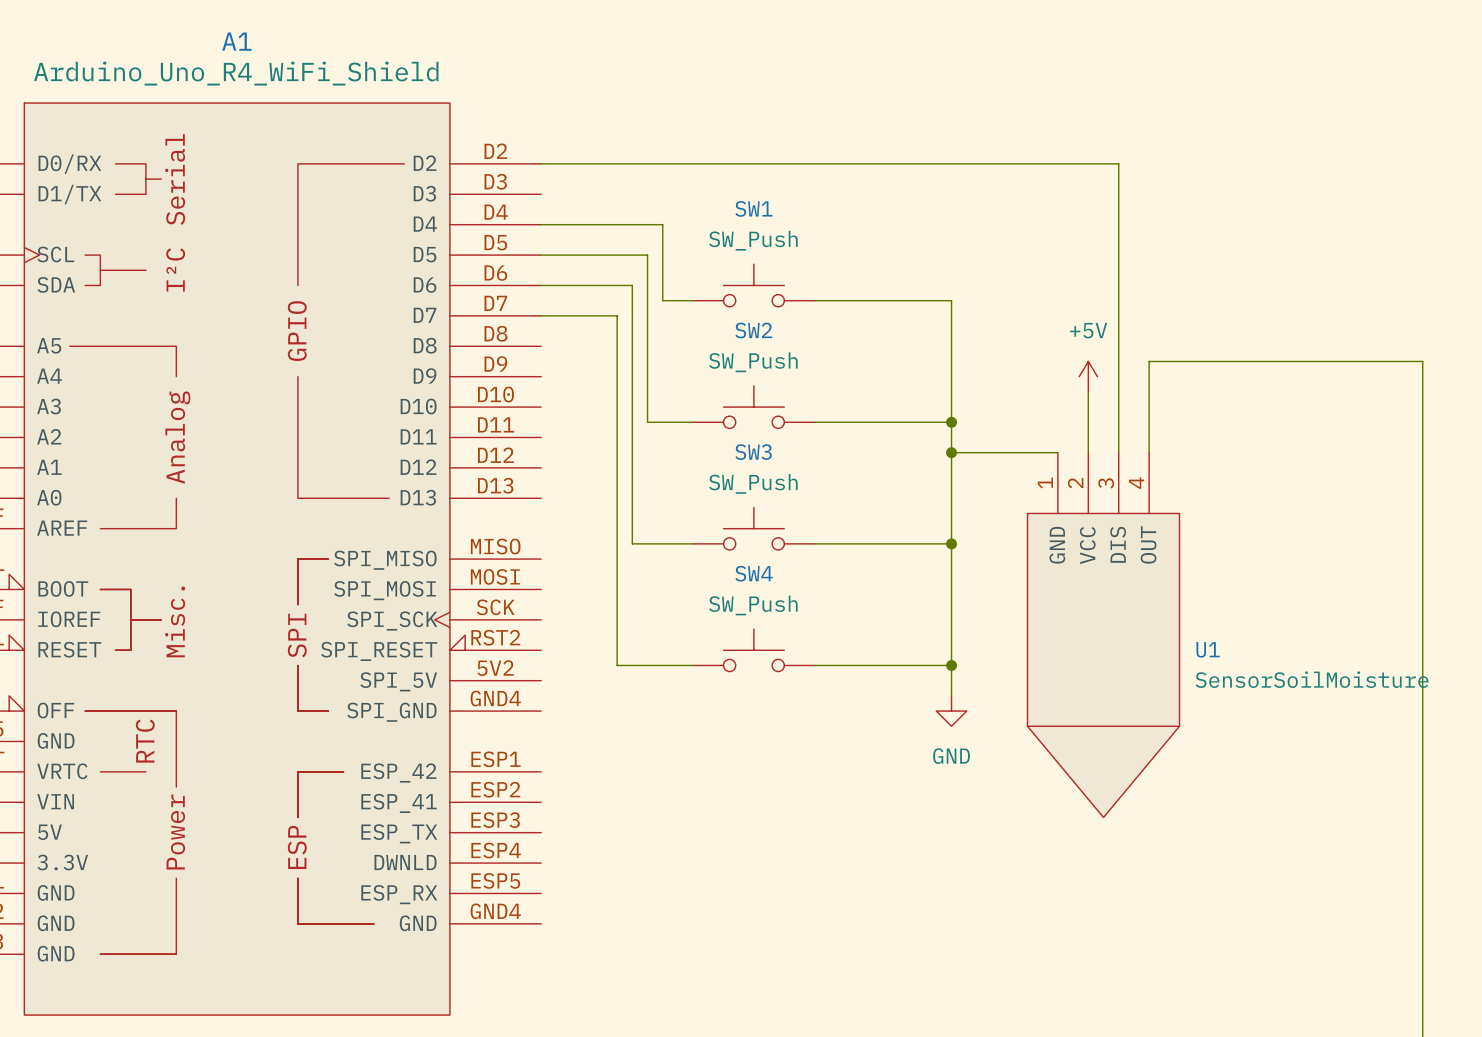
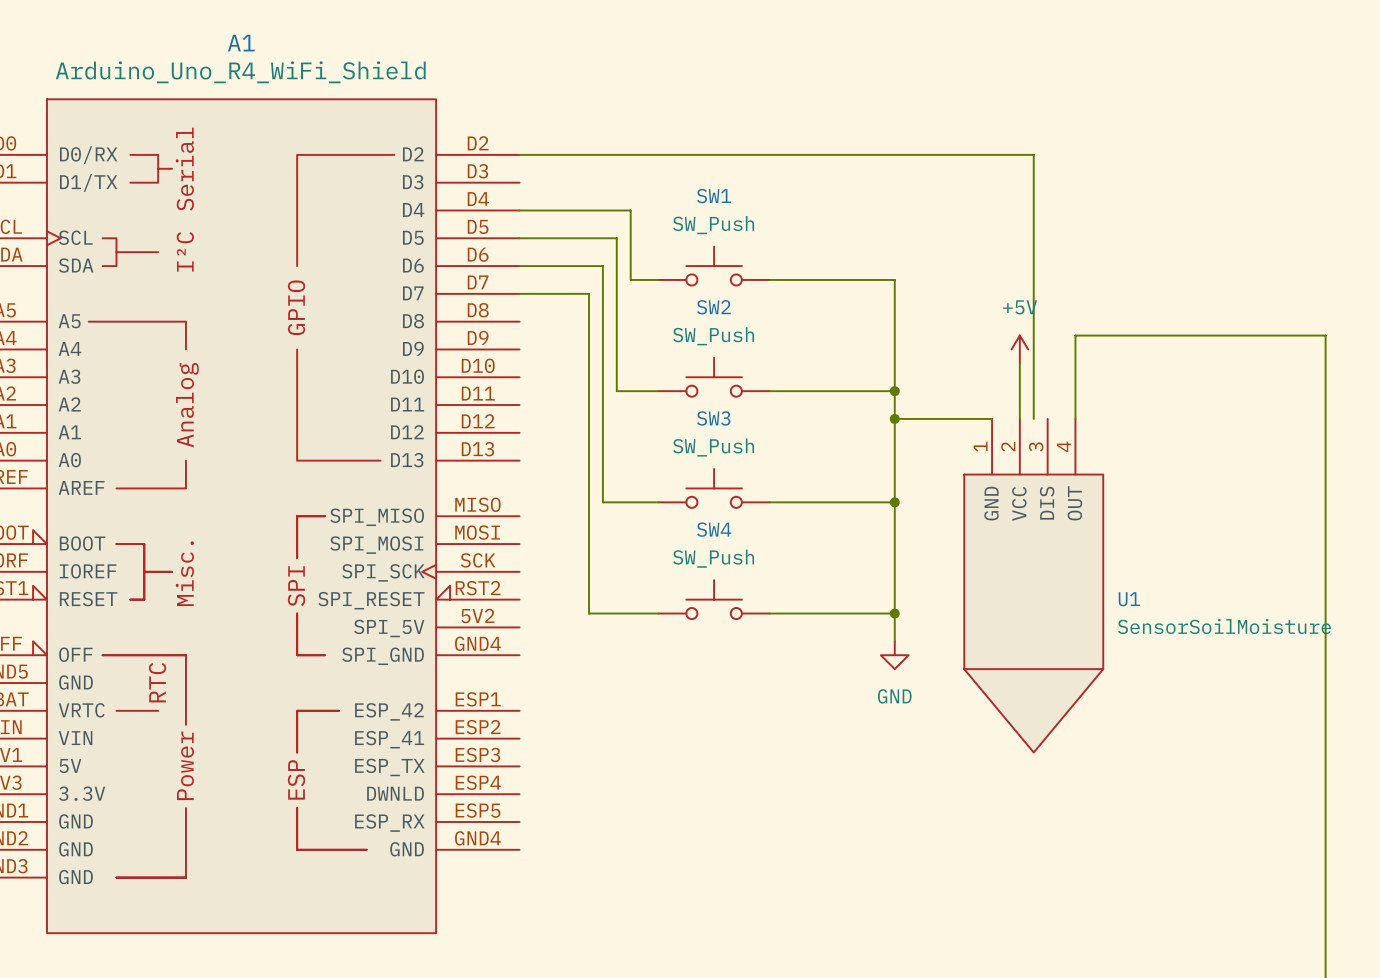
wire: (1103, 163) (1118, 163) (1118, 452) -> (1033, 154) (1033, 418)

